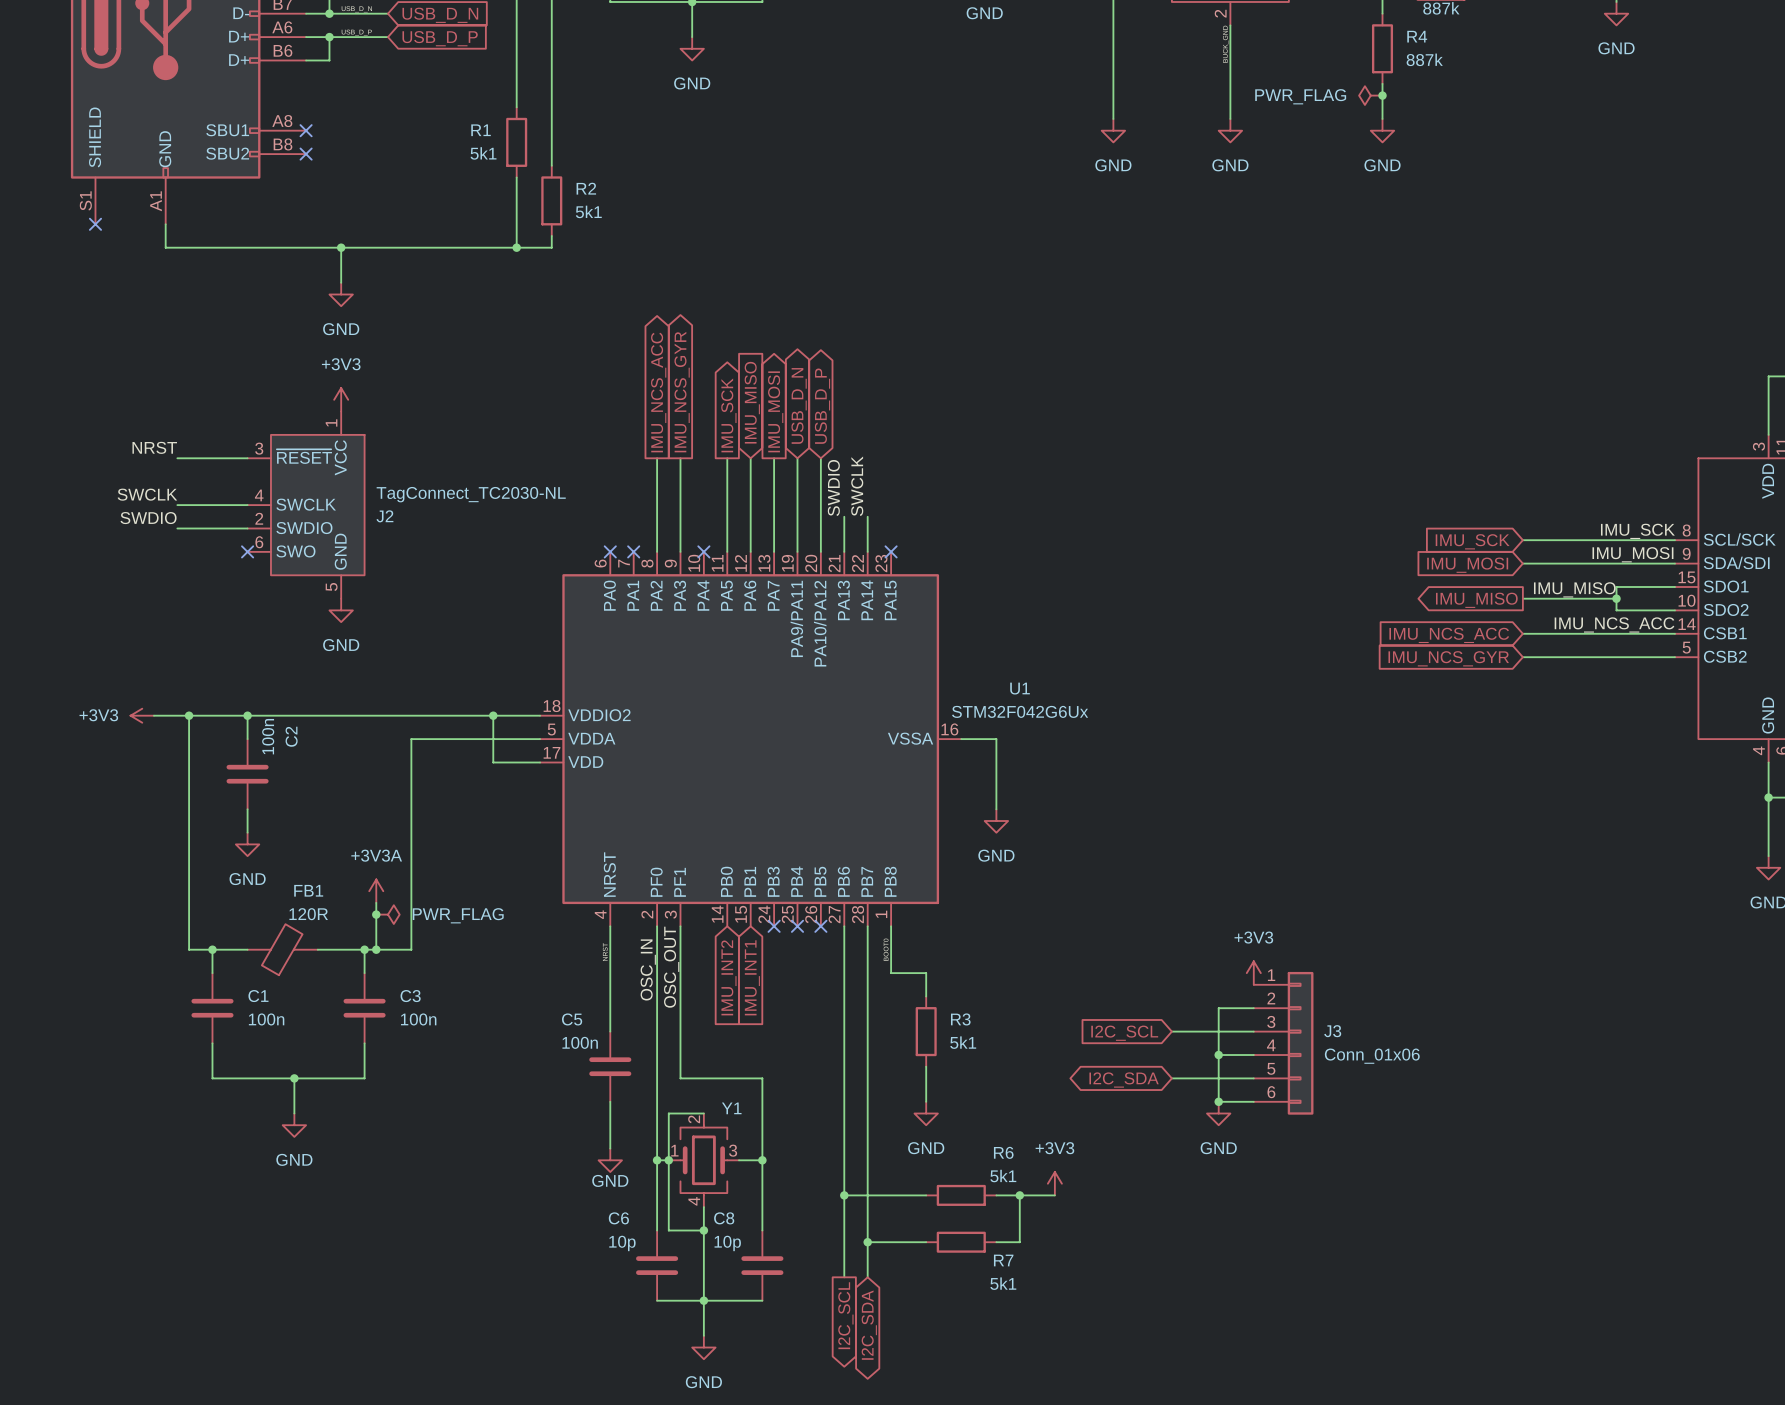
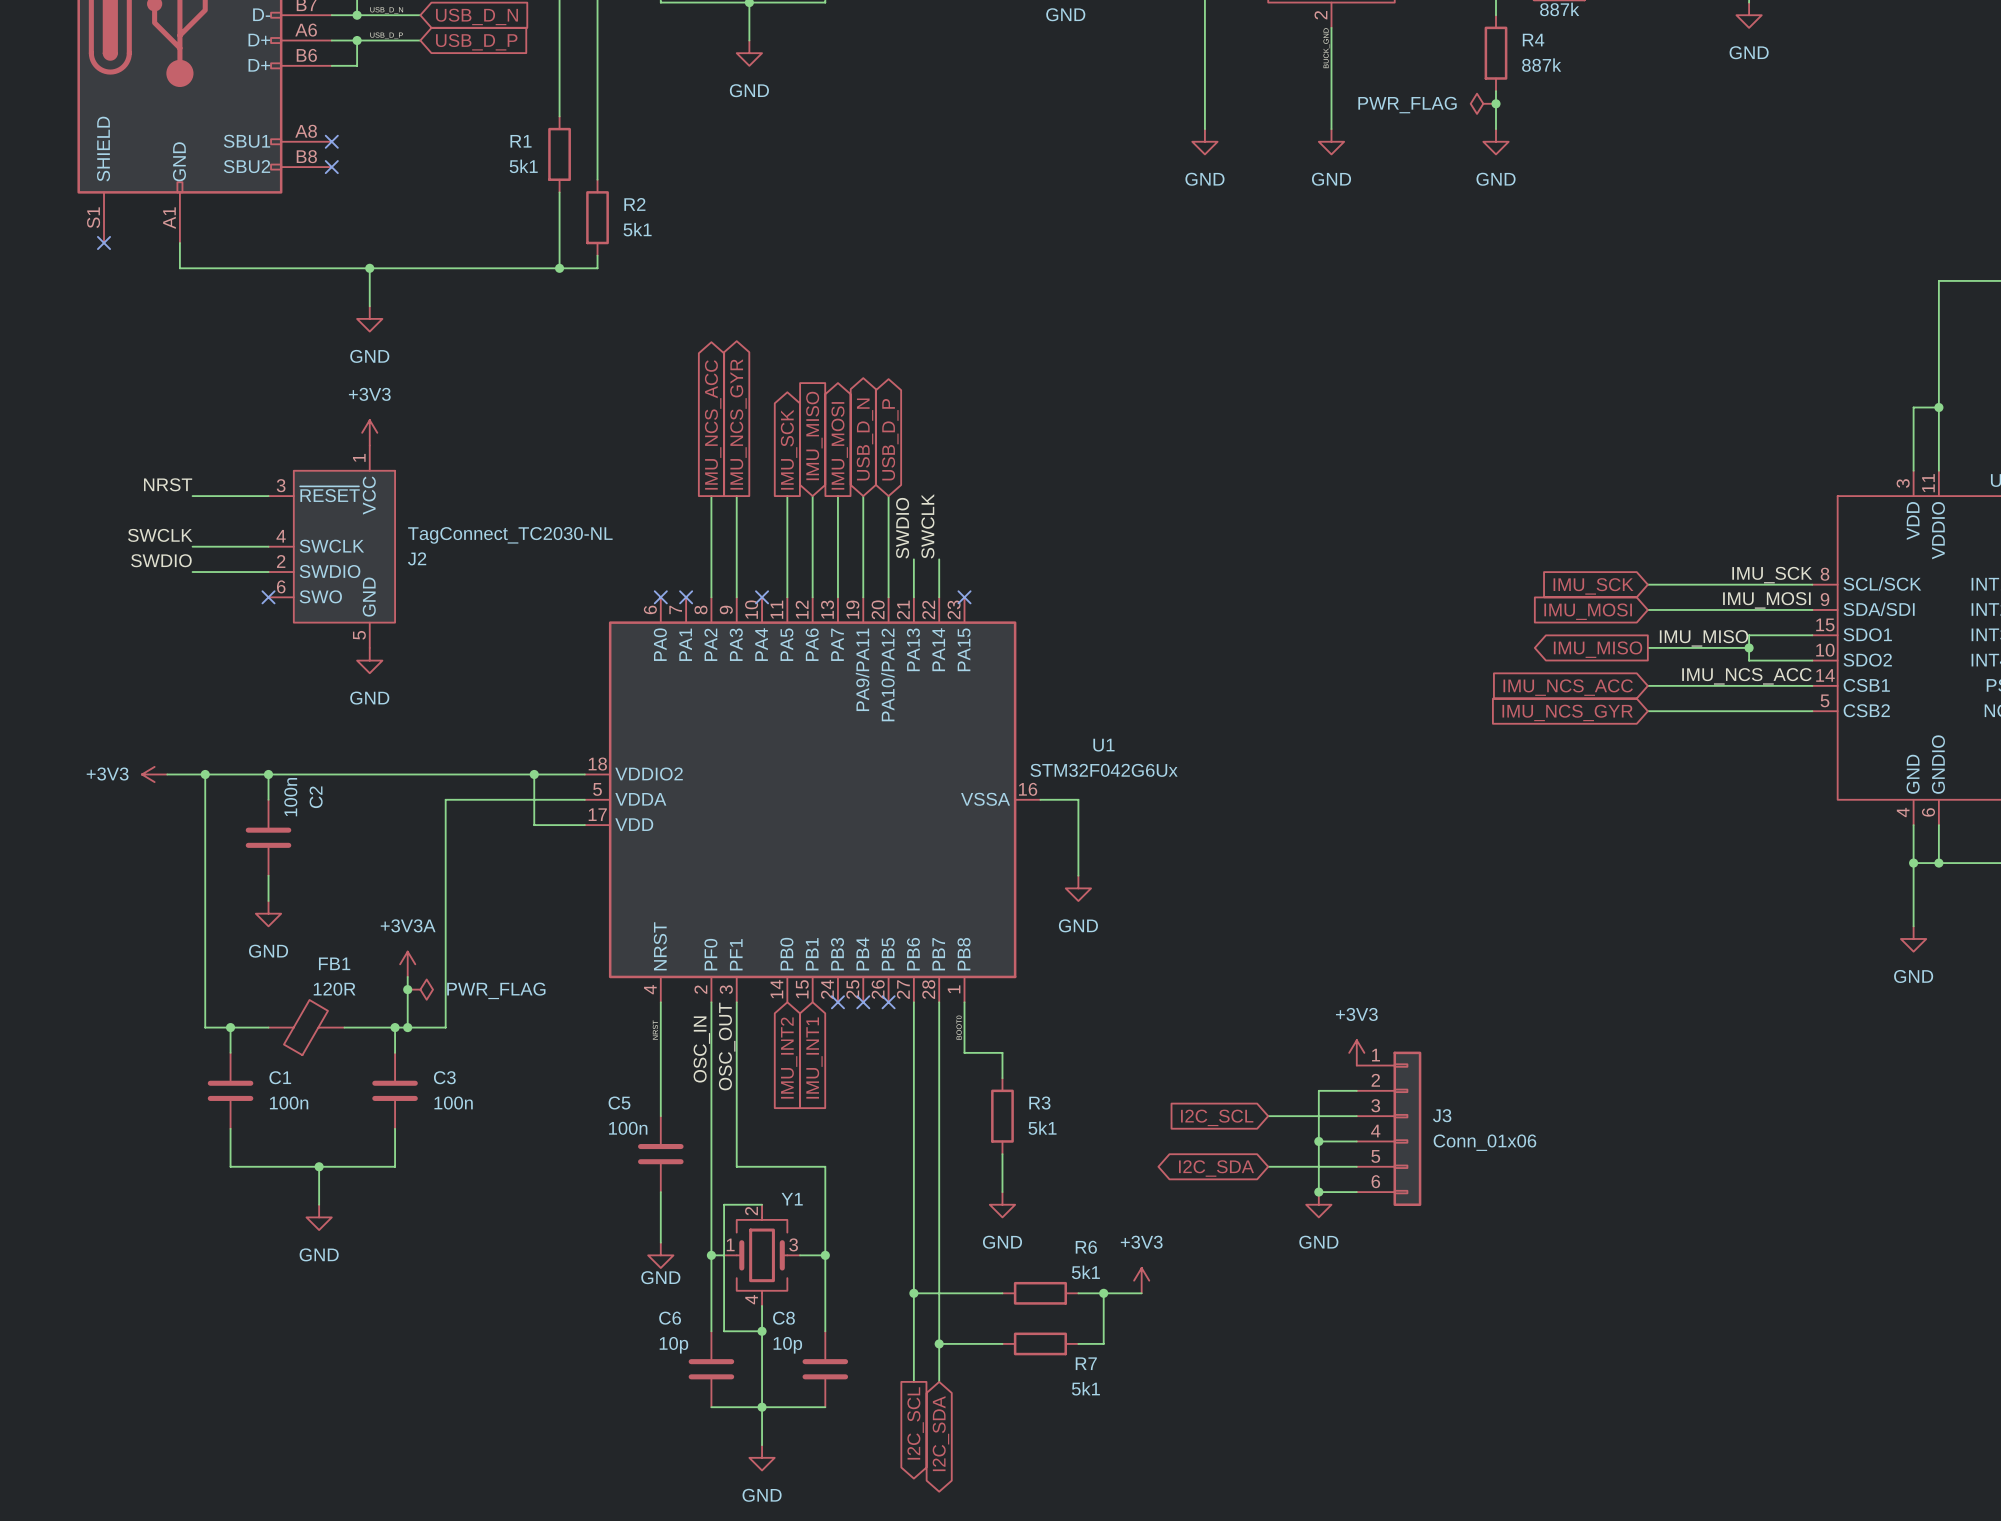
junction: (668, 1160) -> none

